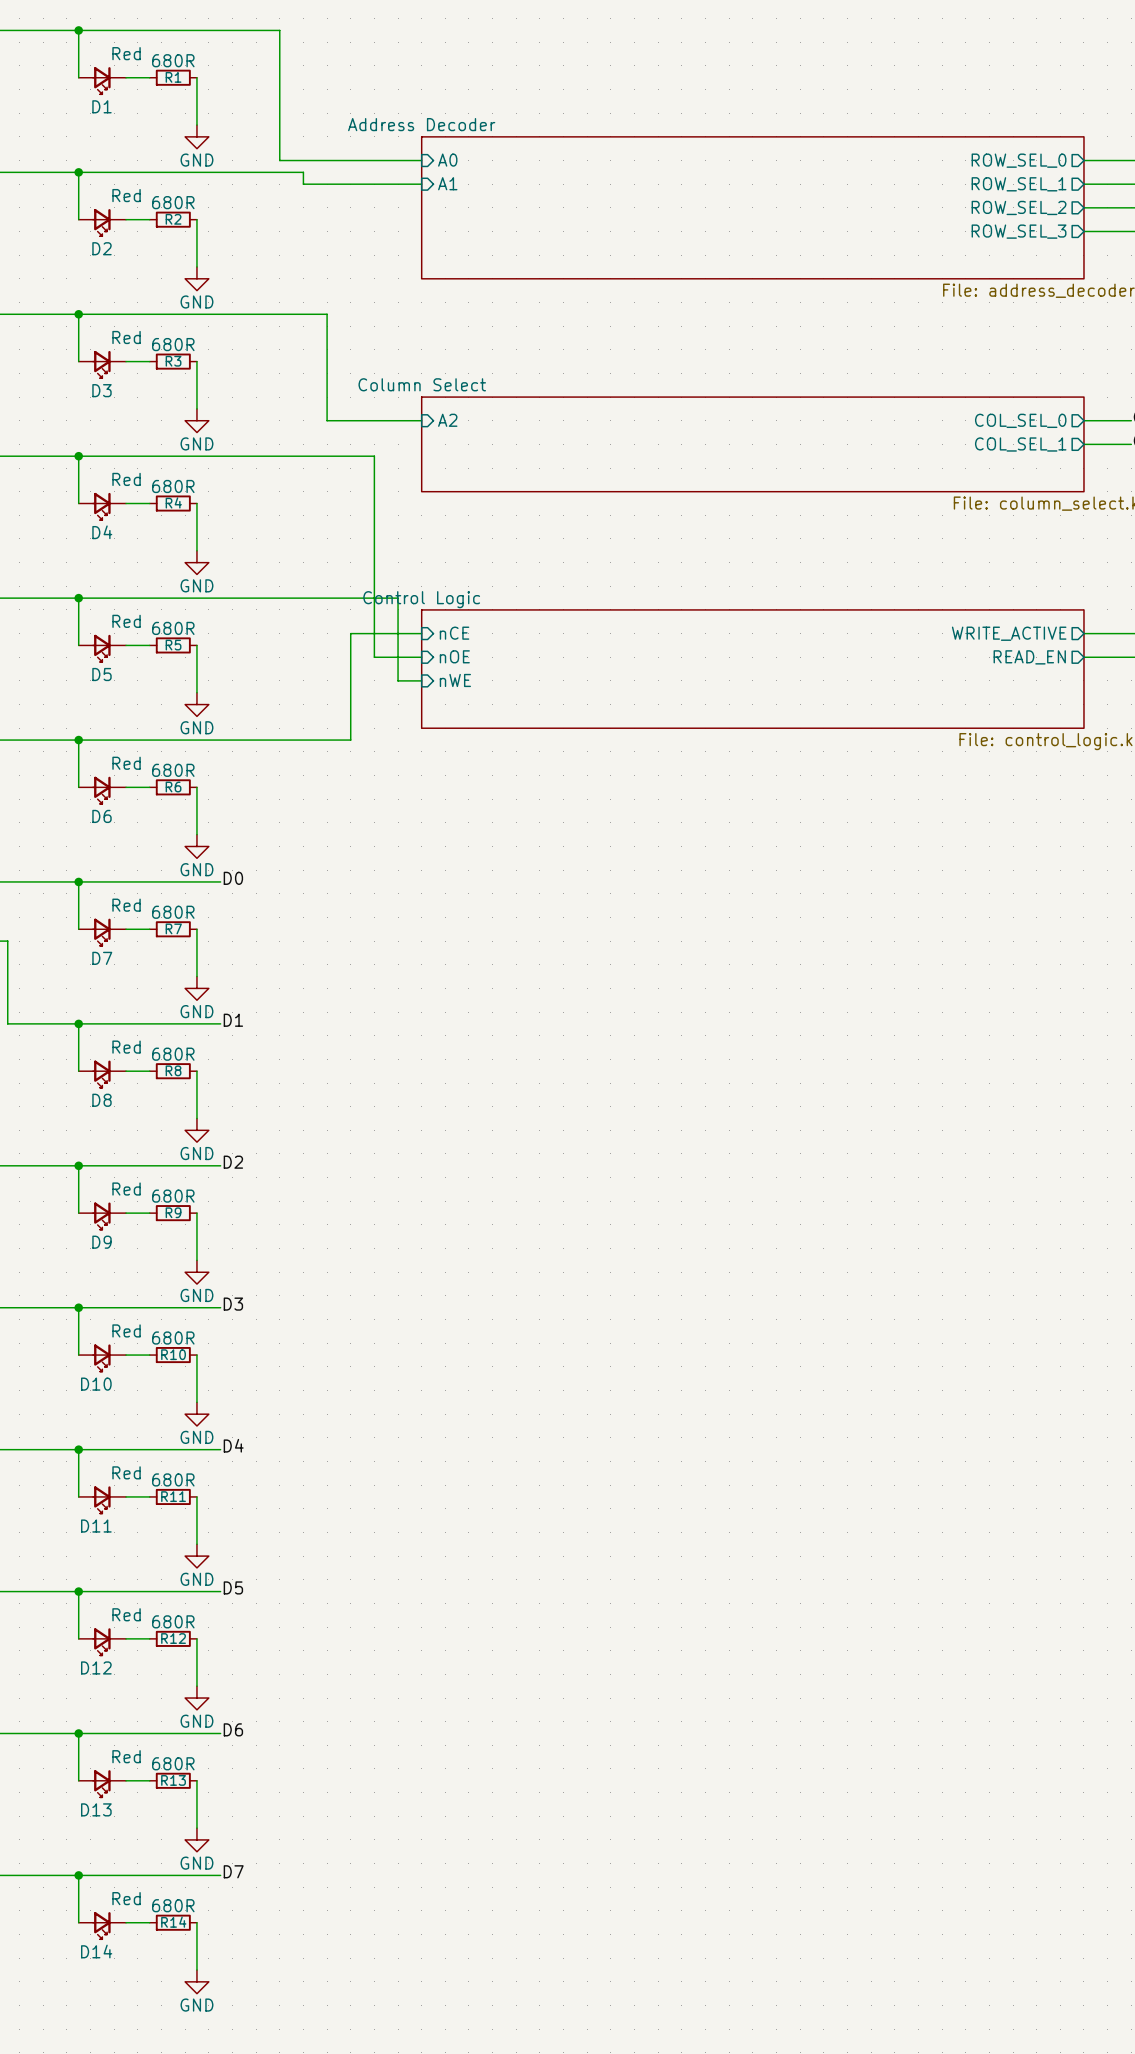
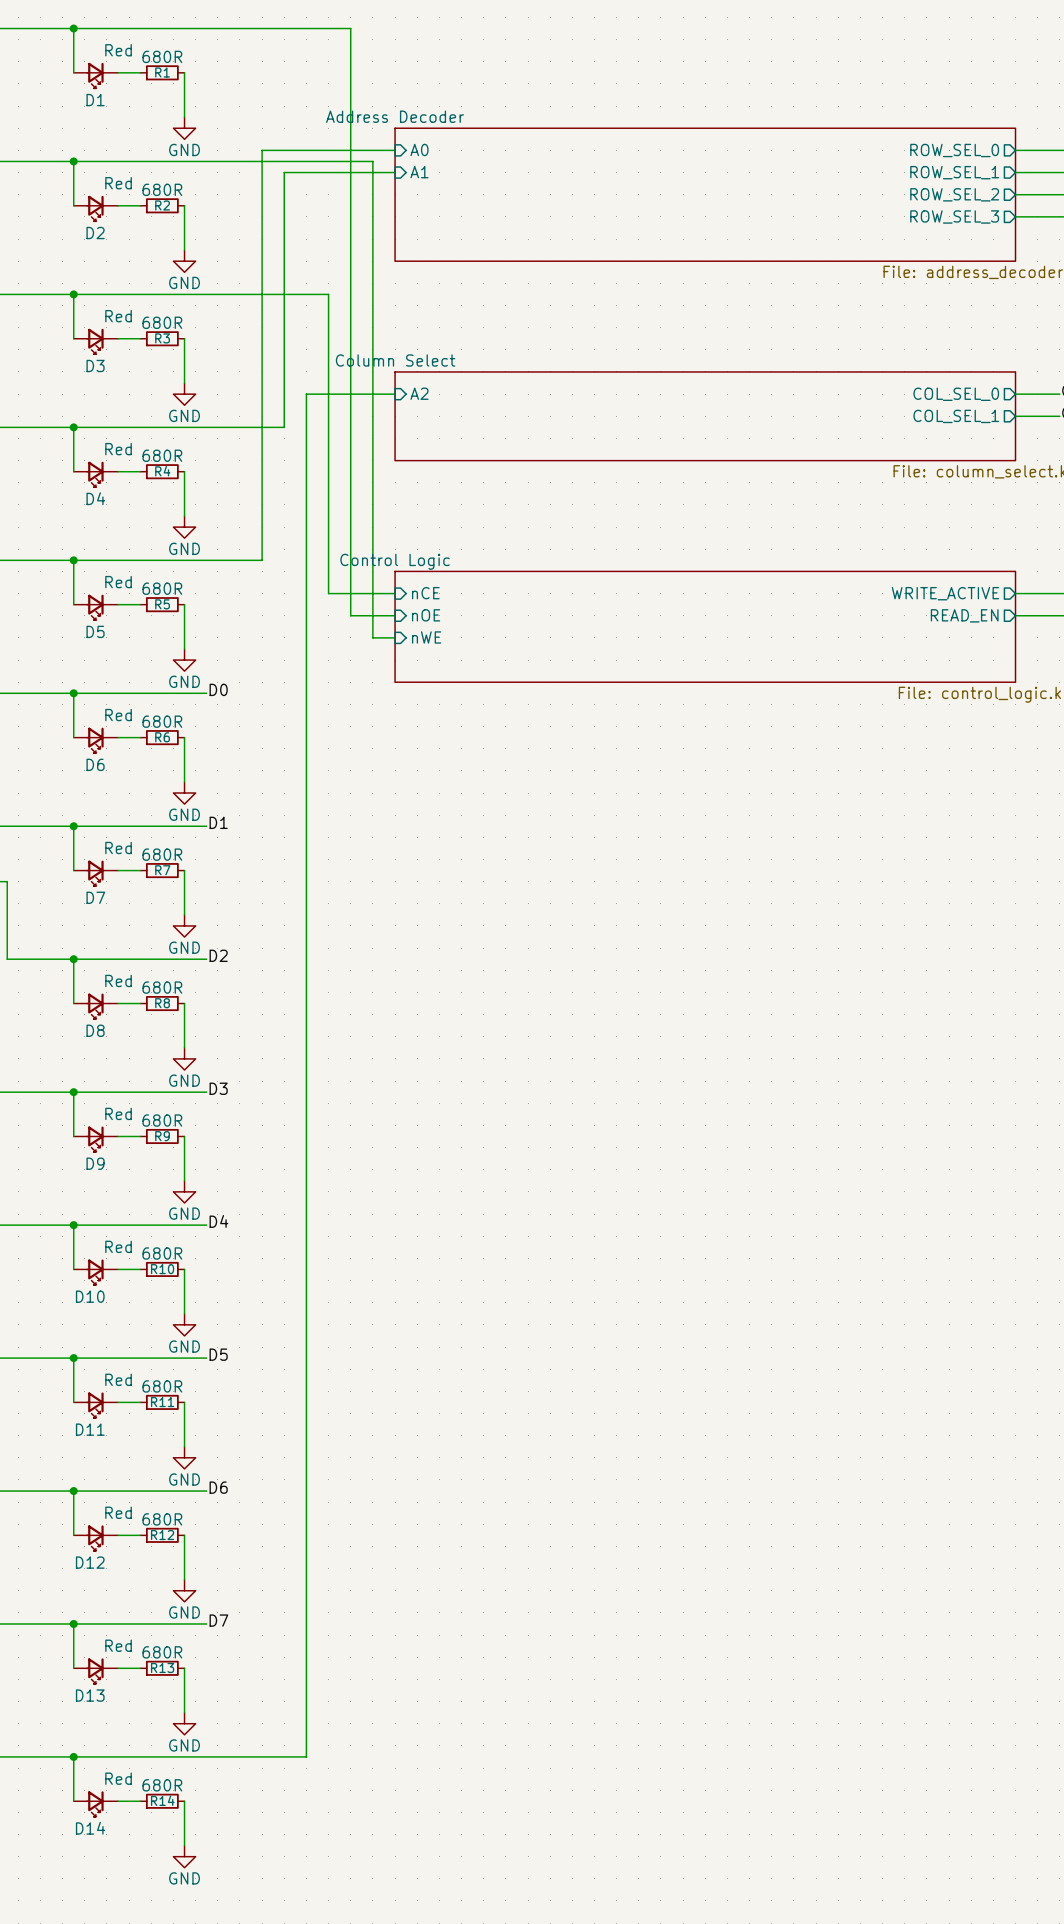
wire: (279, 30) (279, 160) -> (262, 28) (350, 28) (350, 427)
wire: (303, 172) (303, 184) -> (284, 161) (372, 161) (372, 560)
wire: (327, 314) (327, 420) -> (306, 294) (328, 294) (328, 593)
wire: none -> (306, 394) (306, 1756) (206, 1756)
wire: (303, 456) (374, 456) -> (284, 427) (284, 172)
wire: (279, 598) (398, 598) -> (262, 560) (262, 150)
wire: (350, 633) (350, 740) (220, 740) -> none
label: none -> D0 (218, 689)
label: D0 (233, 878) -> D1 (218, 822)
label: D1 (233, 1020) -> D2 (218, 955)
label: D2 (233, 1162) -> D3 (218, 1088)
label: D3 (233, 1304) -> D4 (218, 1221)
label: D4 (233, 1445) -> D5 (218, 1354)
label: D5 (233, 1587) -> D6 (218, 1487)
label: D6 (233, 1729) -> D7 (218, 1620)
label: D7 (233, 1871) -> none

